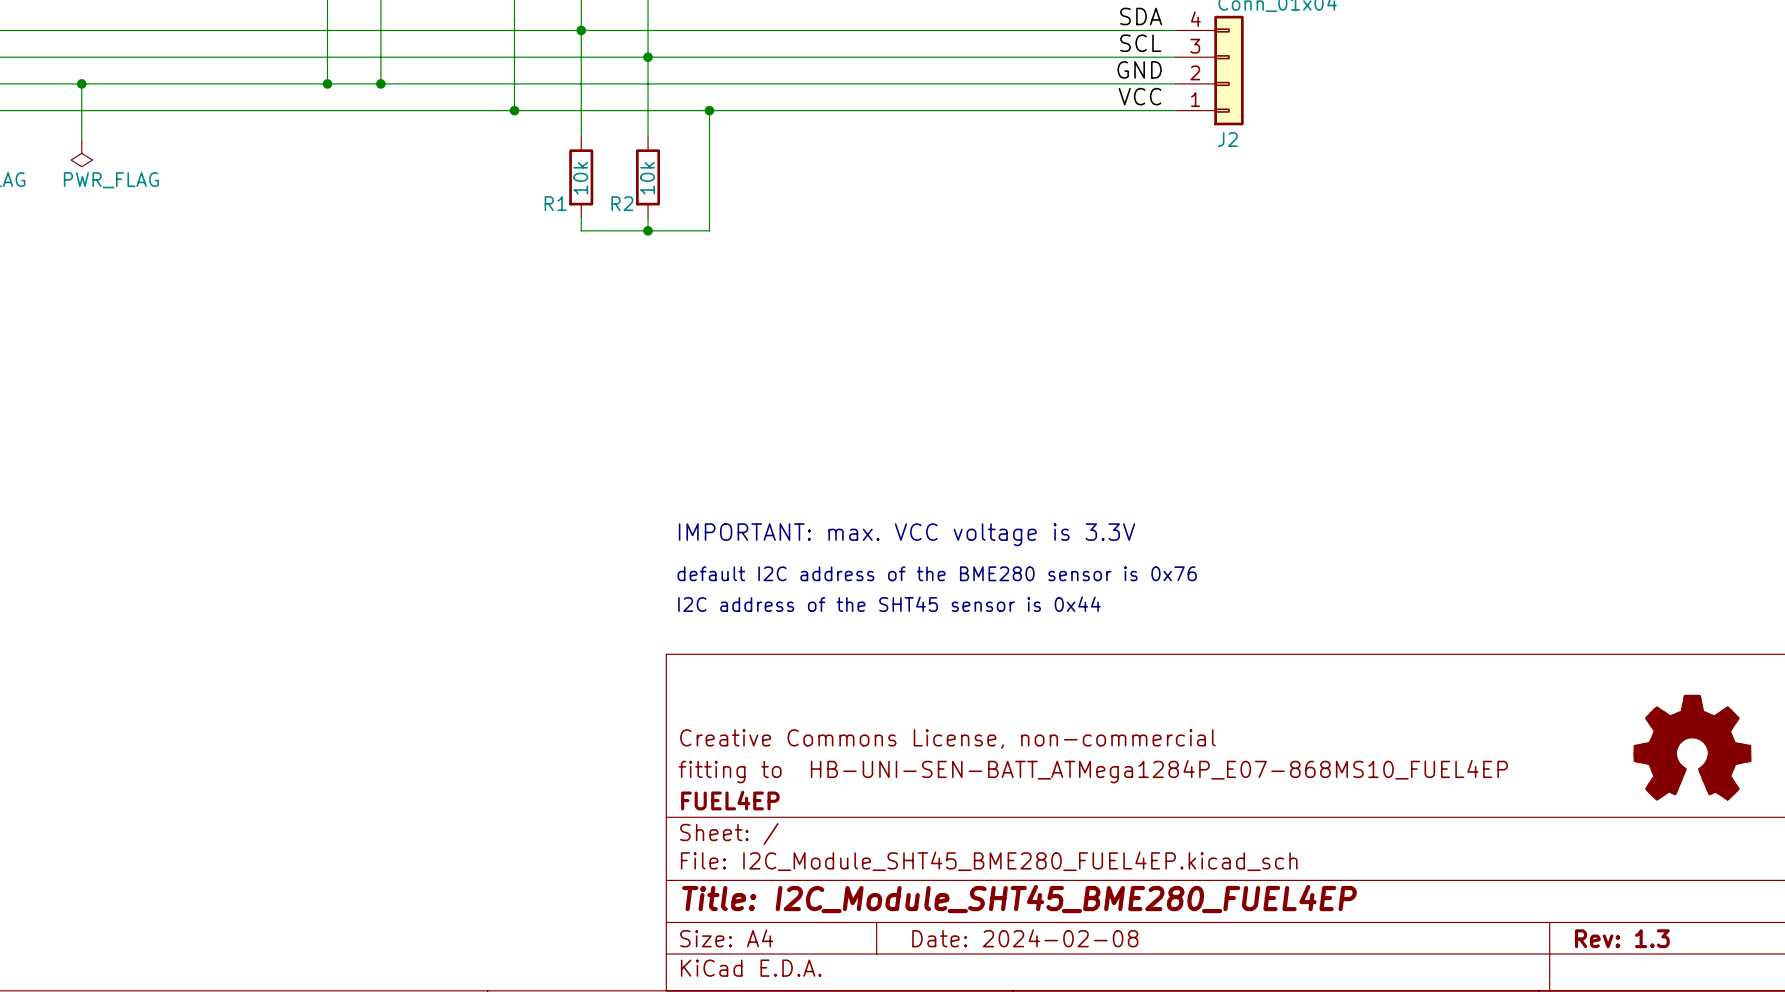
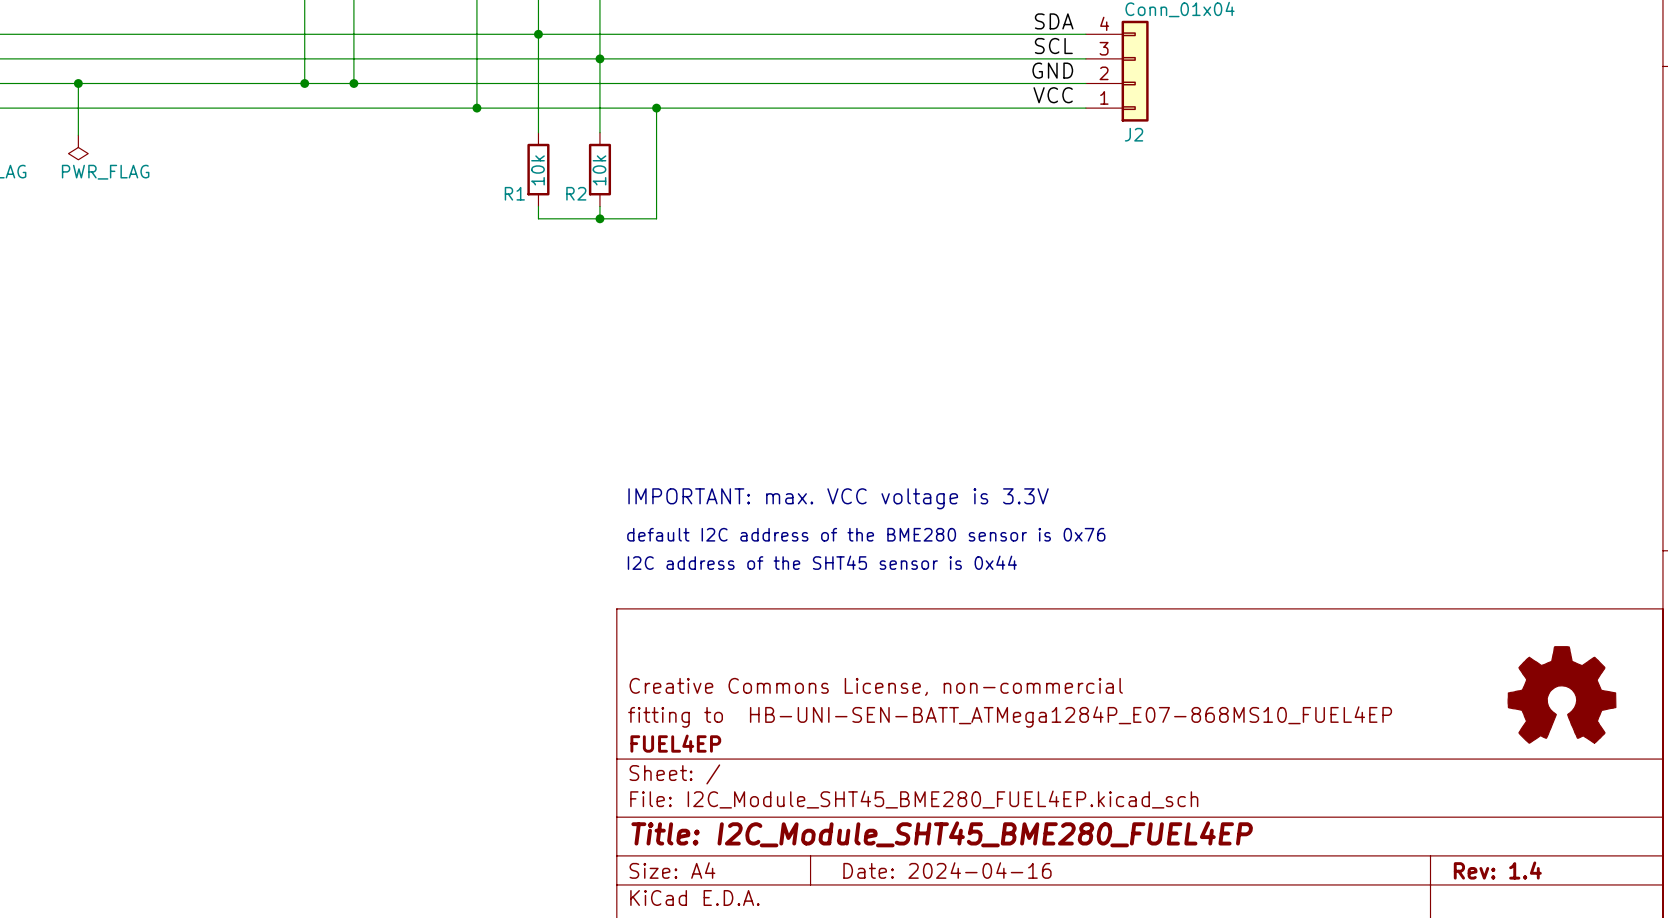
title block: Date: 2024-02-08 (1025, 938) -> Date: 2024-04-16 (947, 870)
title block: Rev: 1.3 (1622, 938) -> Rev: 1.4 (1497, 870)

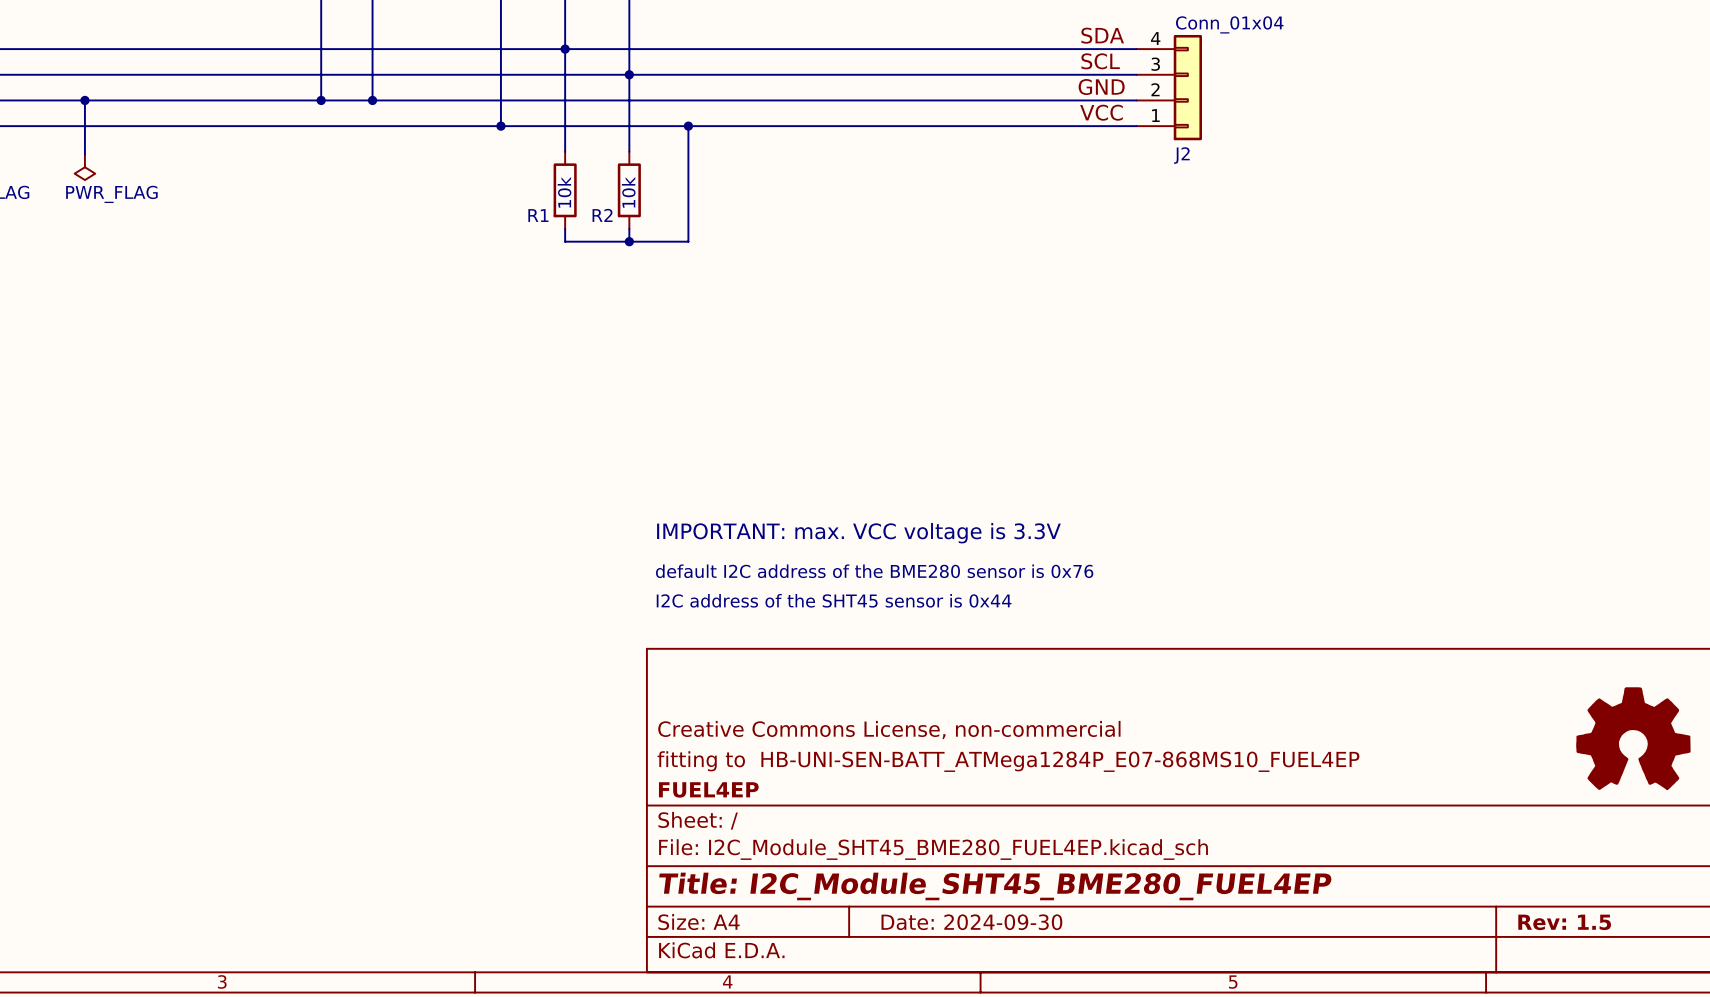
title block: Date: 2024-04-16 (947, 870) -> Date: 2024-09-30 (971, 922)
title block: Rev: 1.4 (1497, 870) -> Rev: 1.5 (1564, 922)

